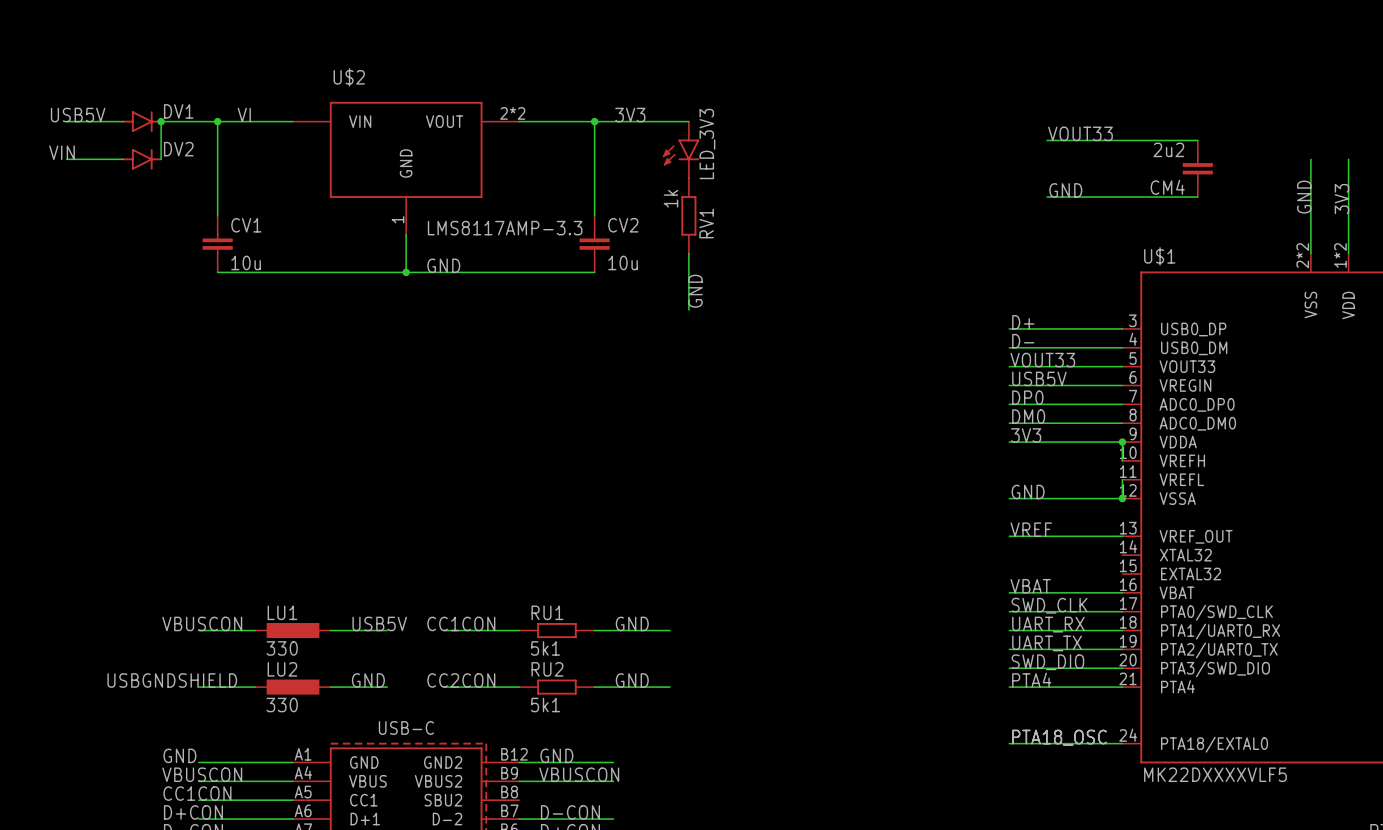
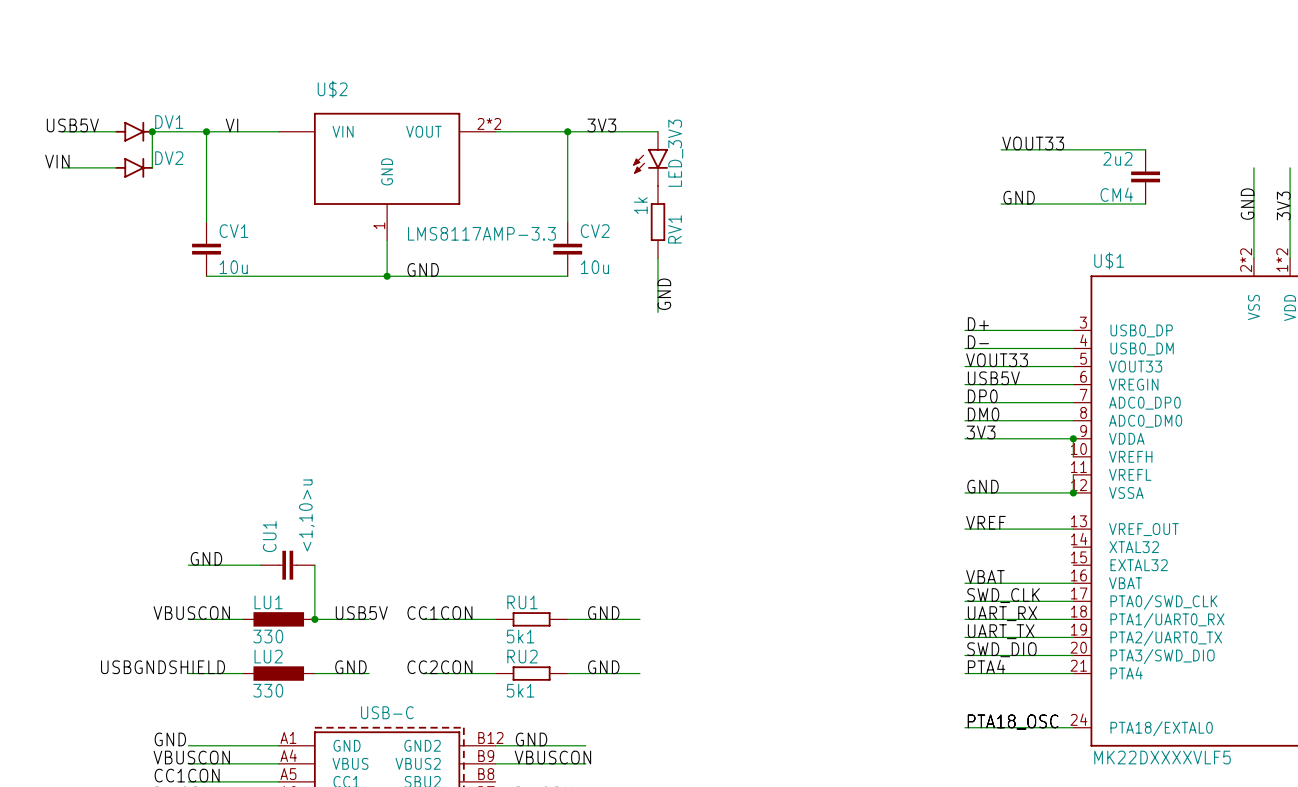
label: none -> GND (206, 558)
wire: none -> (188, 565) (260, 565)
CU1: none -> <1,10>u (287, 565)
wire: none -> (314, 565) (314, 619)
junction: none -> (314, 619)

